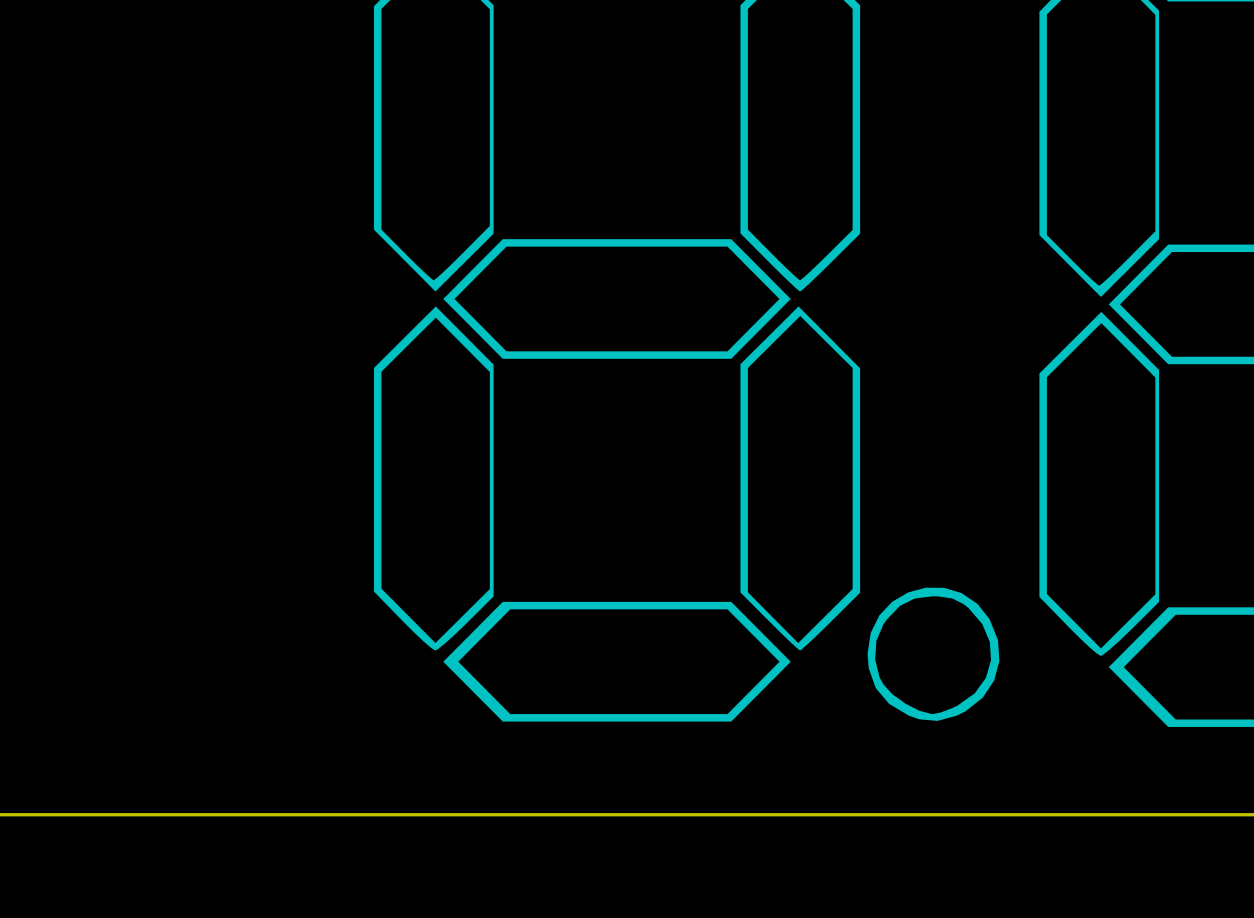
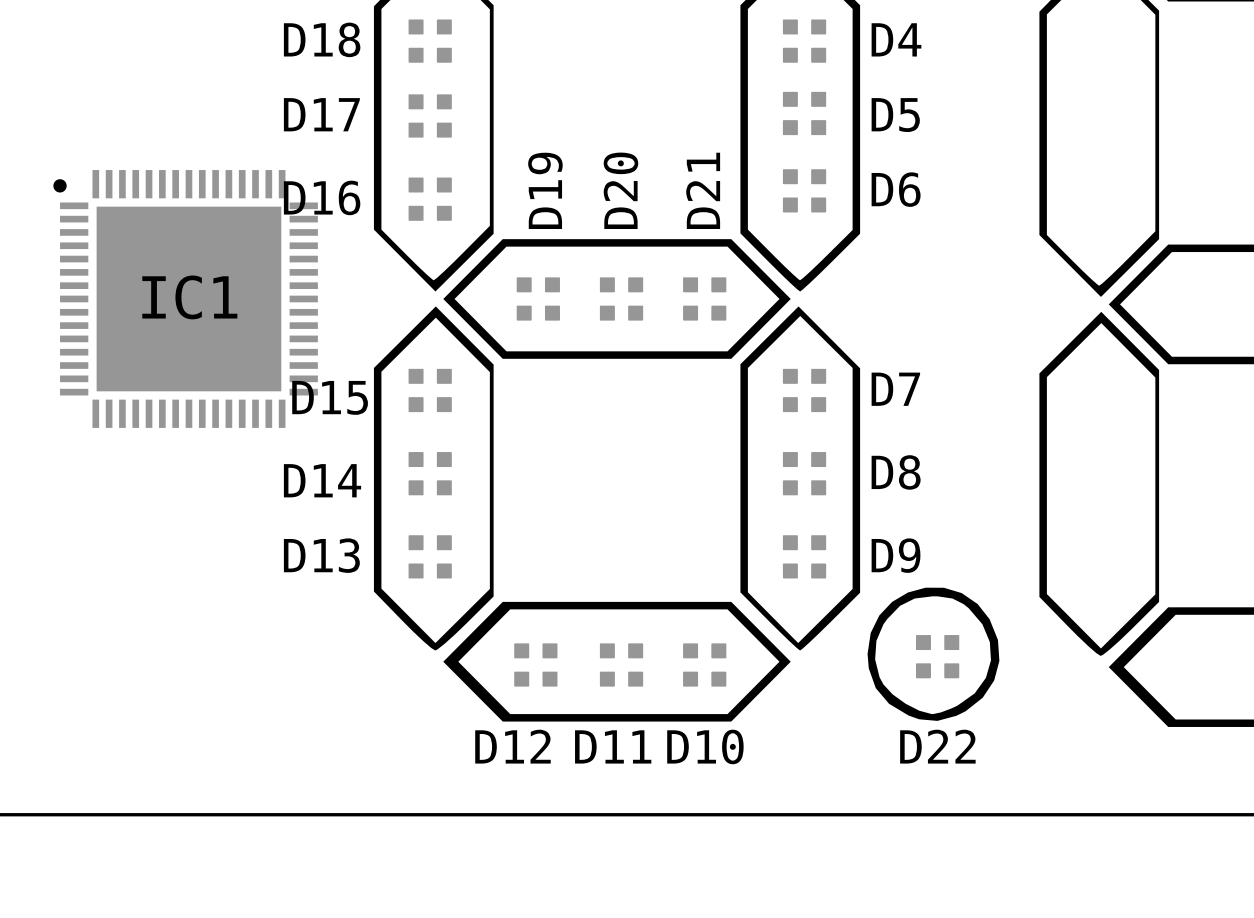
D18: none -> (432, 38)
D4: none -> (806, 38)
D5: none -> (806, 111)
D17: none -> (432, 113)
D6: none -> (806, 188)
D16: none -> (432, 196)
D19: none -> (540, 296)
D20: none -> (623, 296)
D21: none -> (707, 296)
IC1: none -> (185, 298)
D15: none -> (432, 388)
D7: none -> (806, 388)
D14: none -> (432, 471)
D8: none -> (806, 471)
D13: none -> (432, 554)
D9: none -> (806, 554)
D22: none -> (940, 654)
D12: none -> (538, 662)
D11: none -> (623, 662)
D10: none -> (707, 662)

